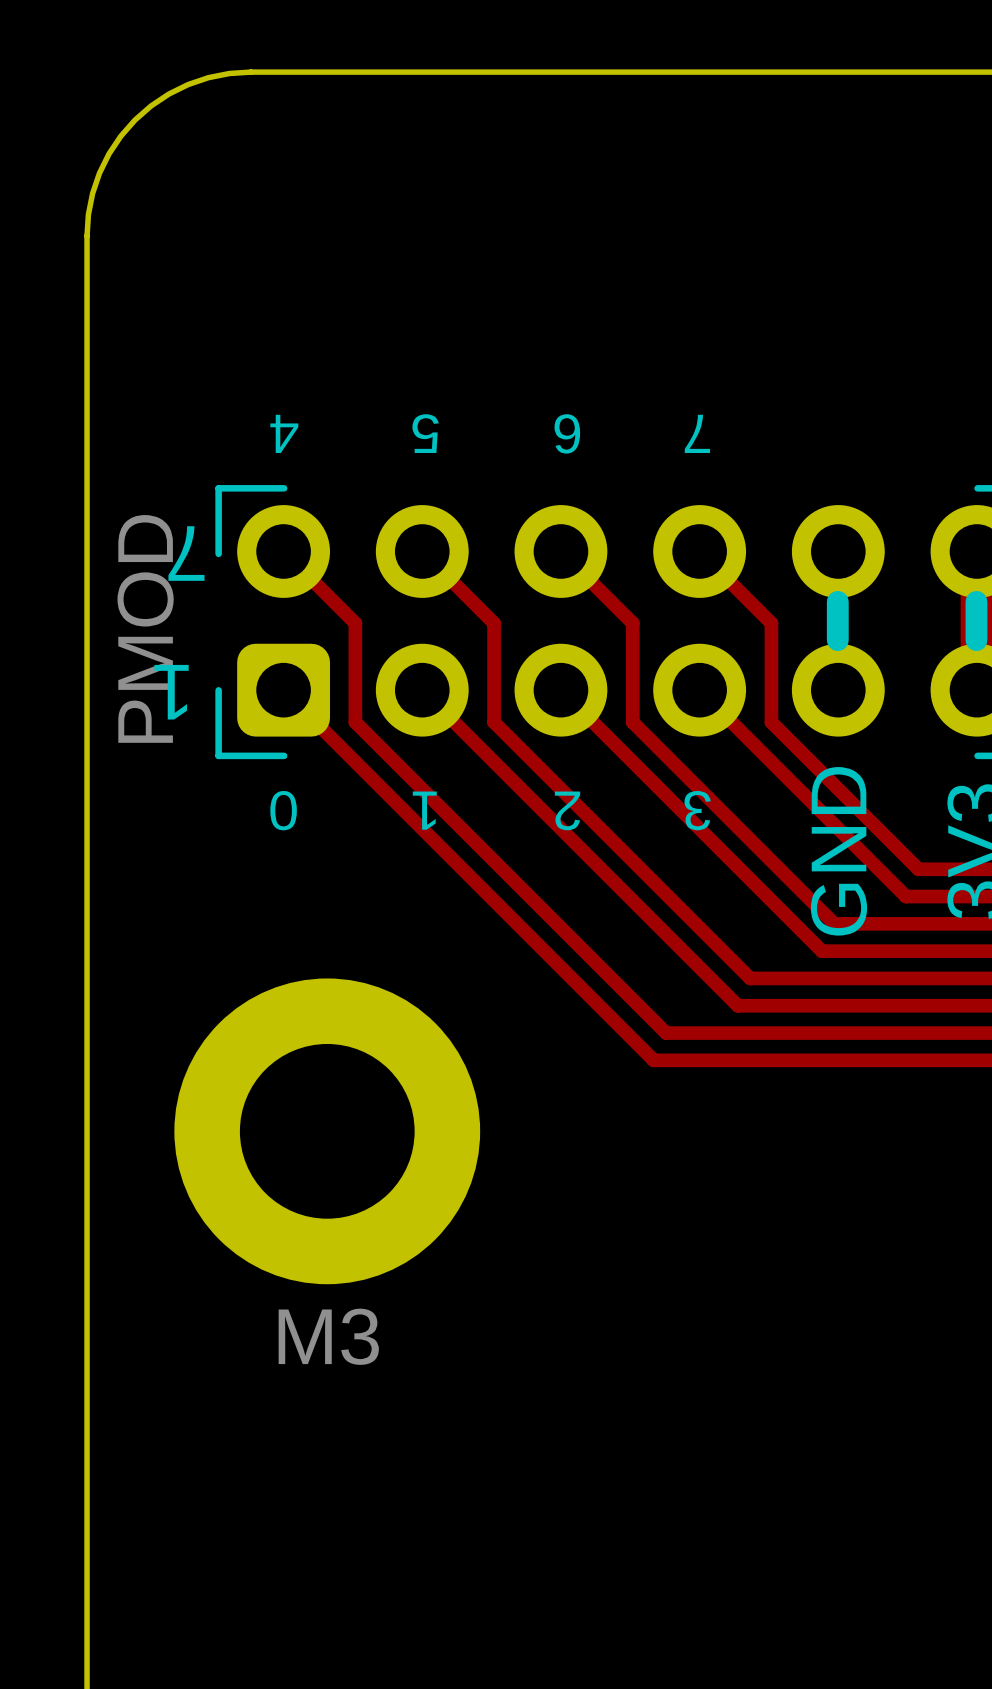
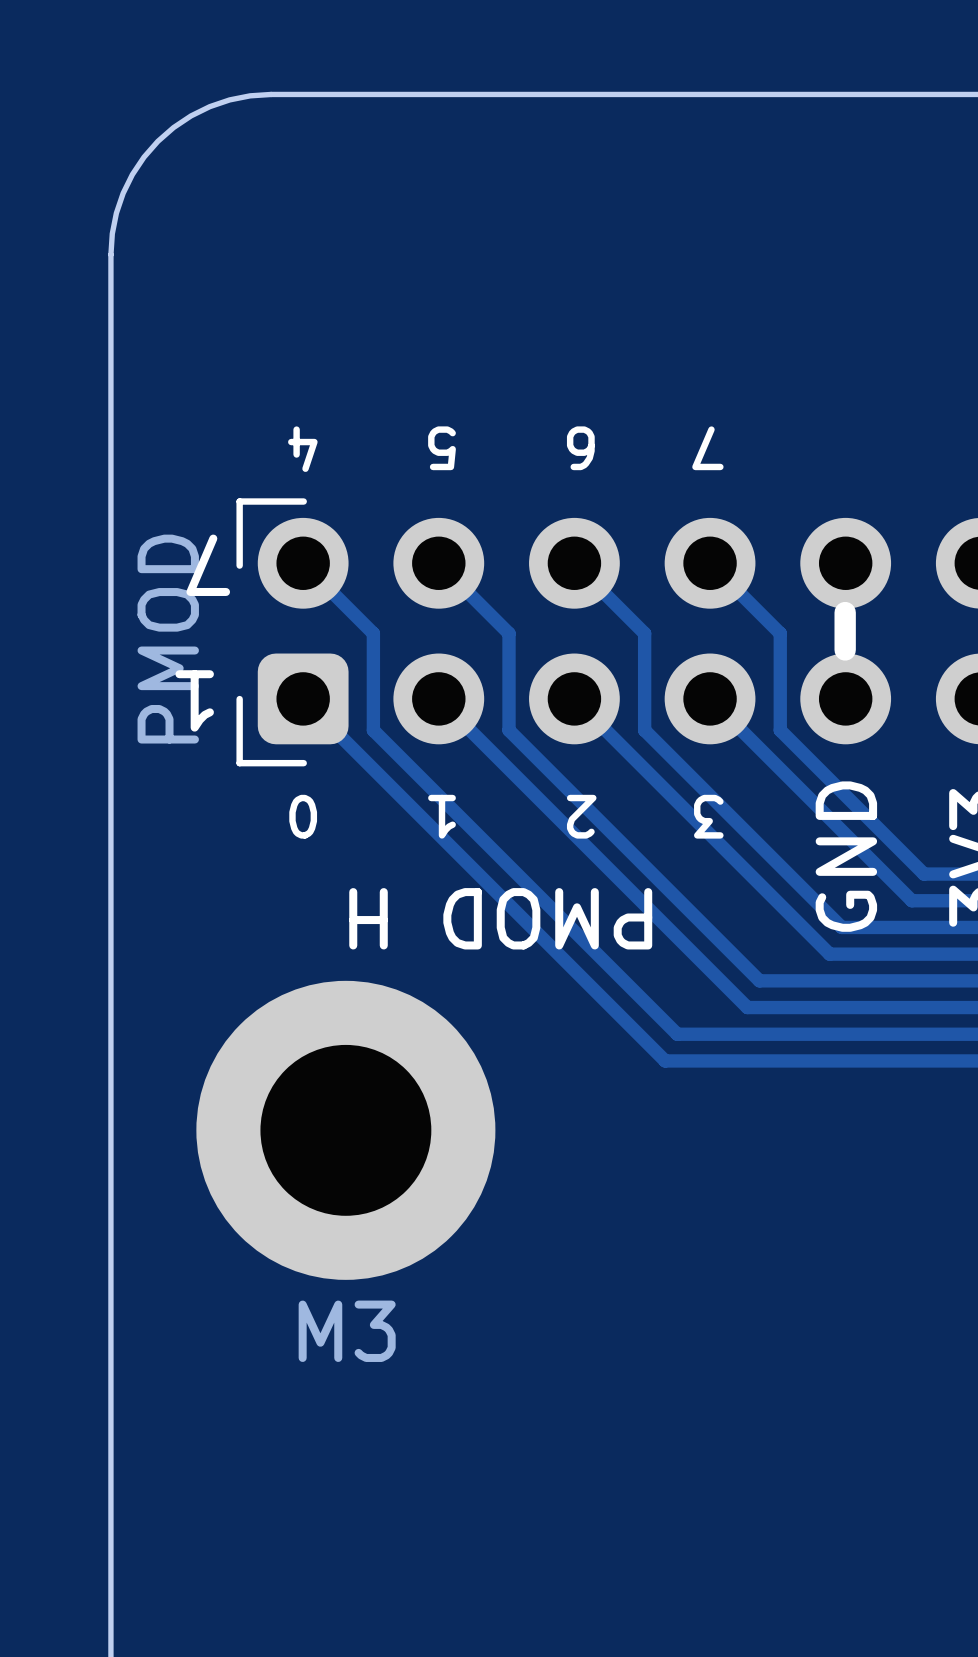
text: none -> PMOD H (500, 918)

